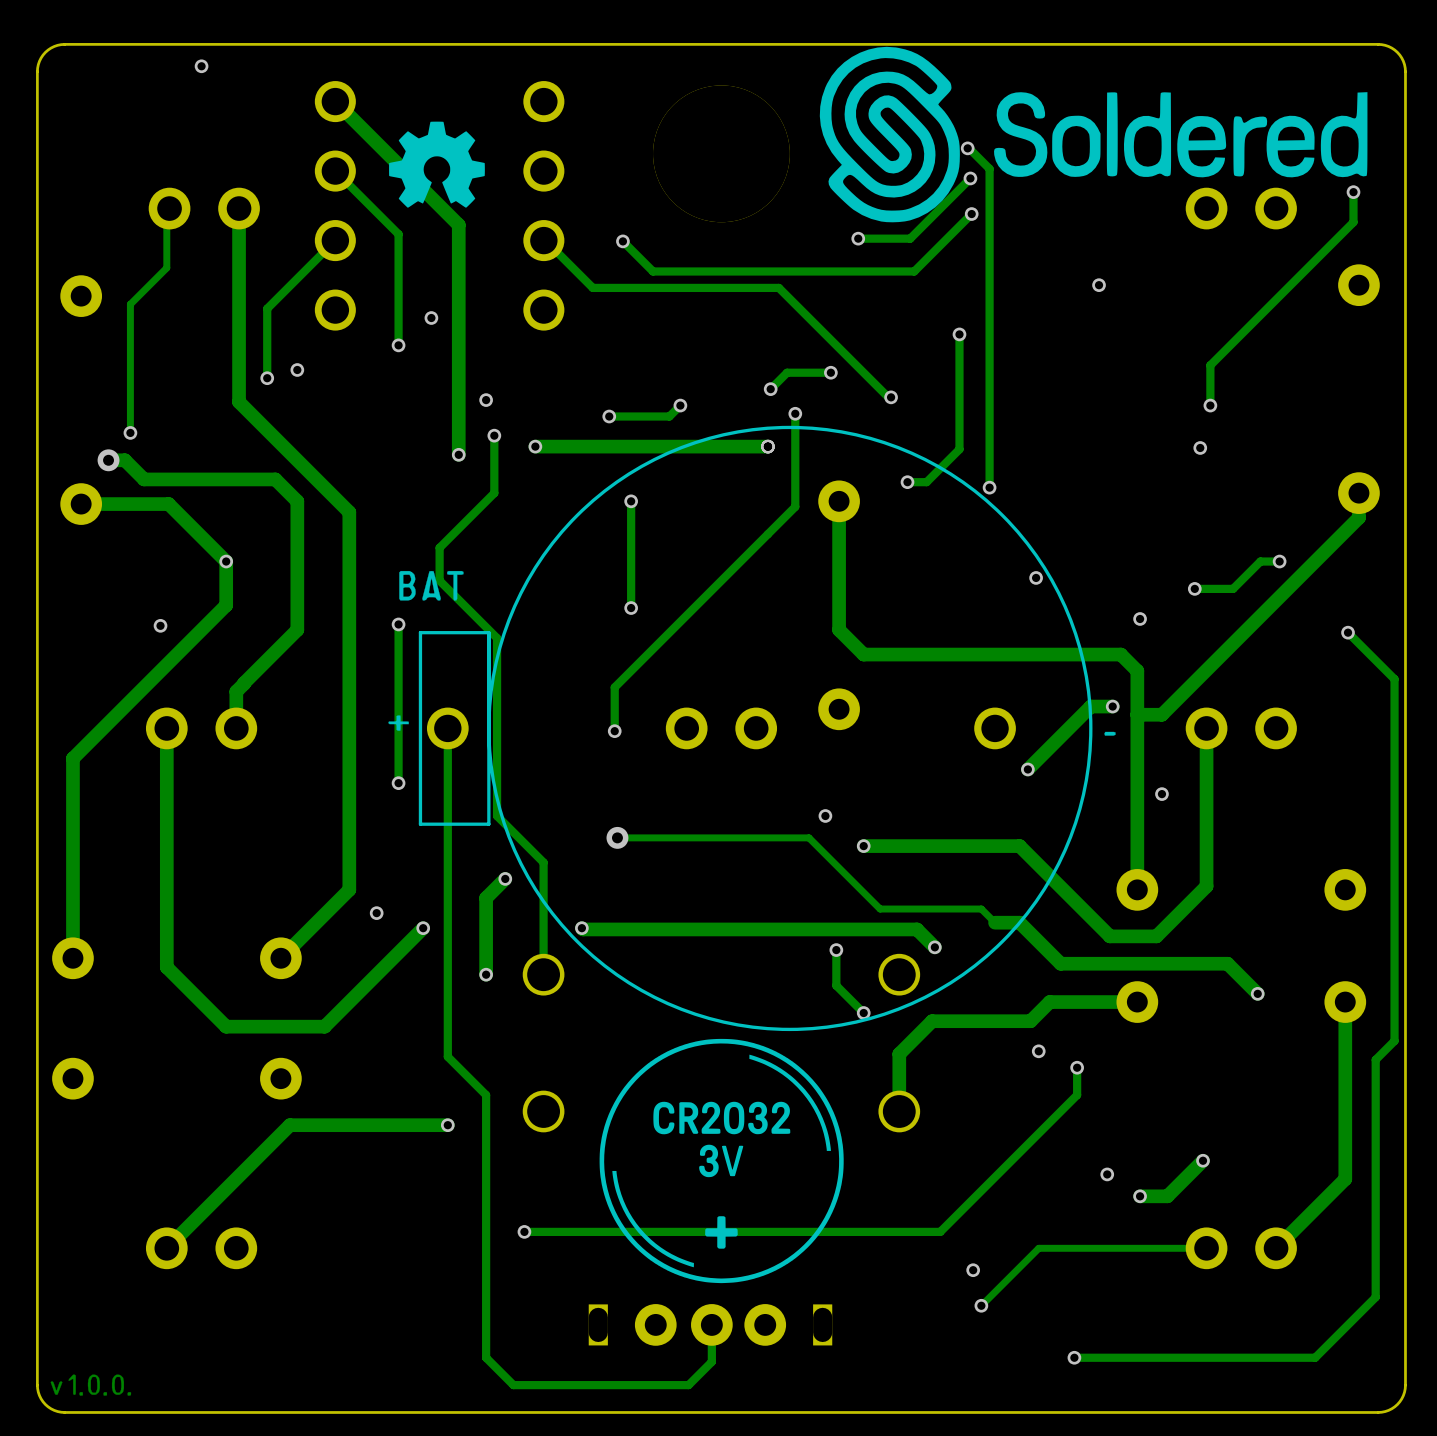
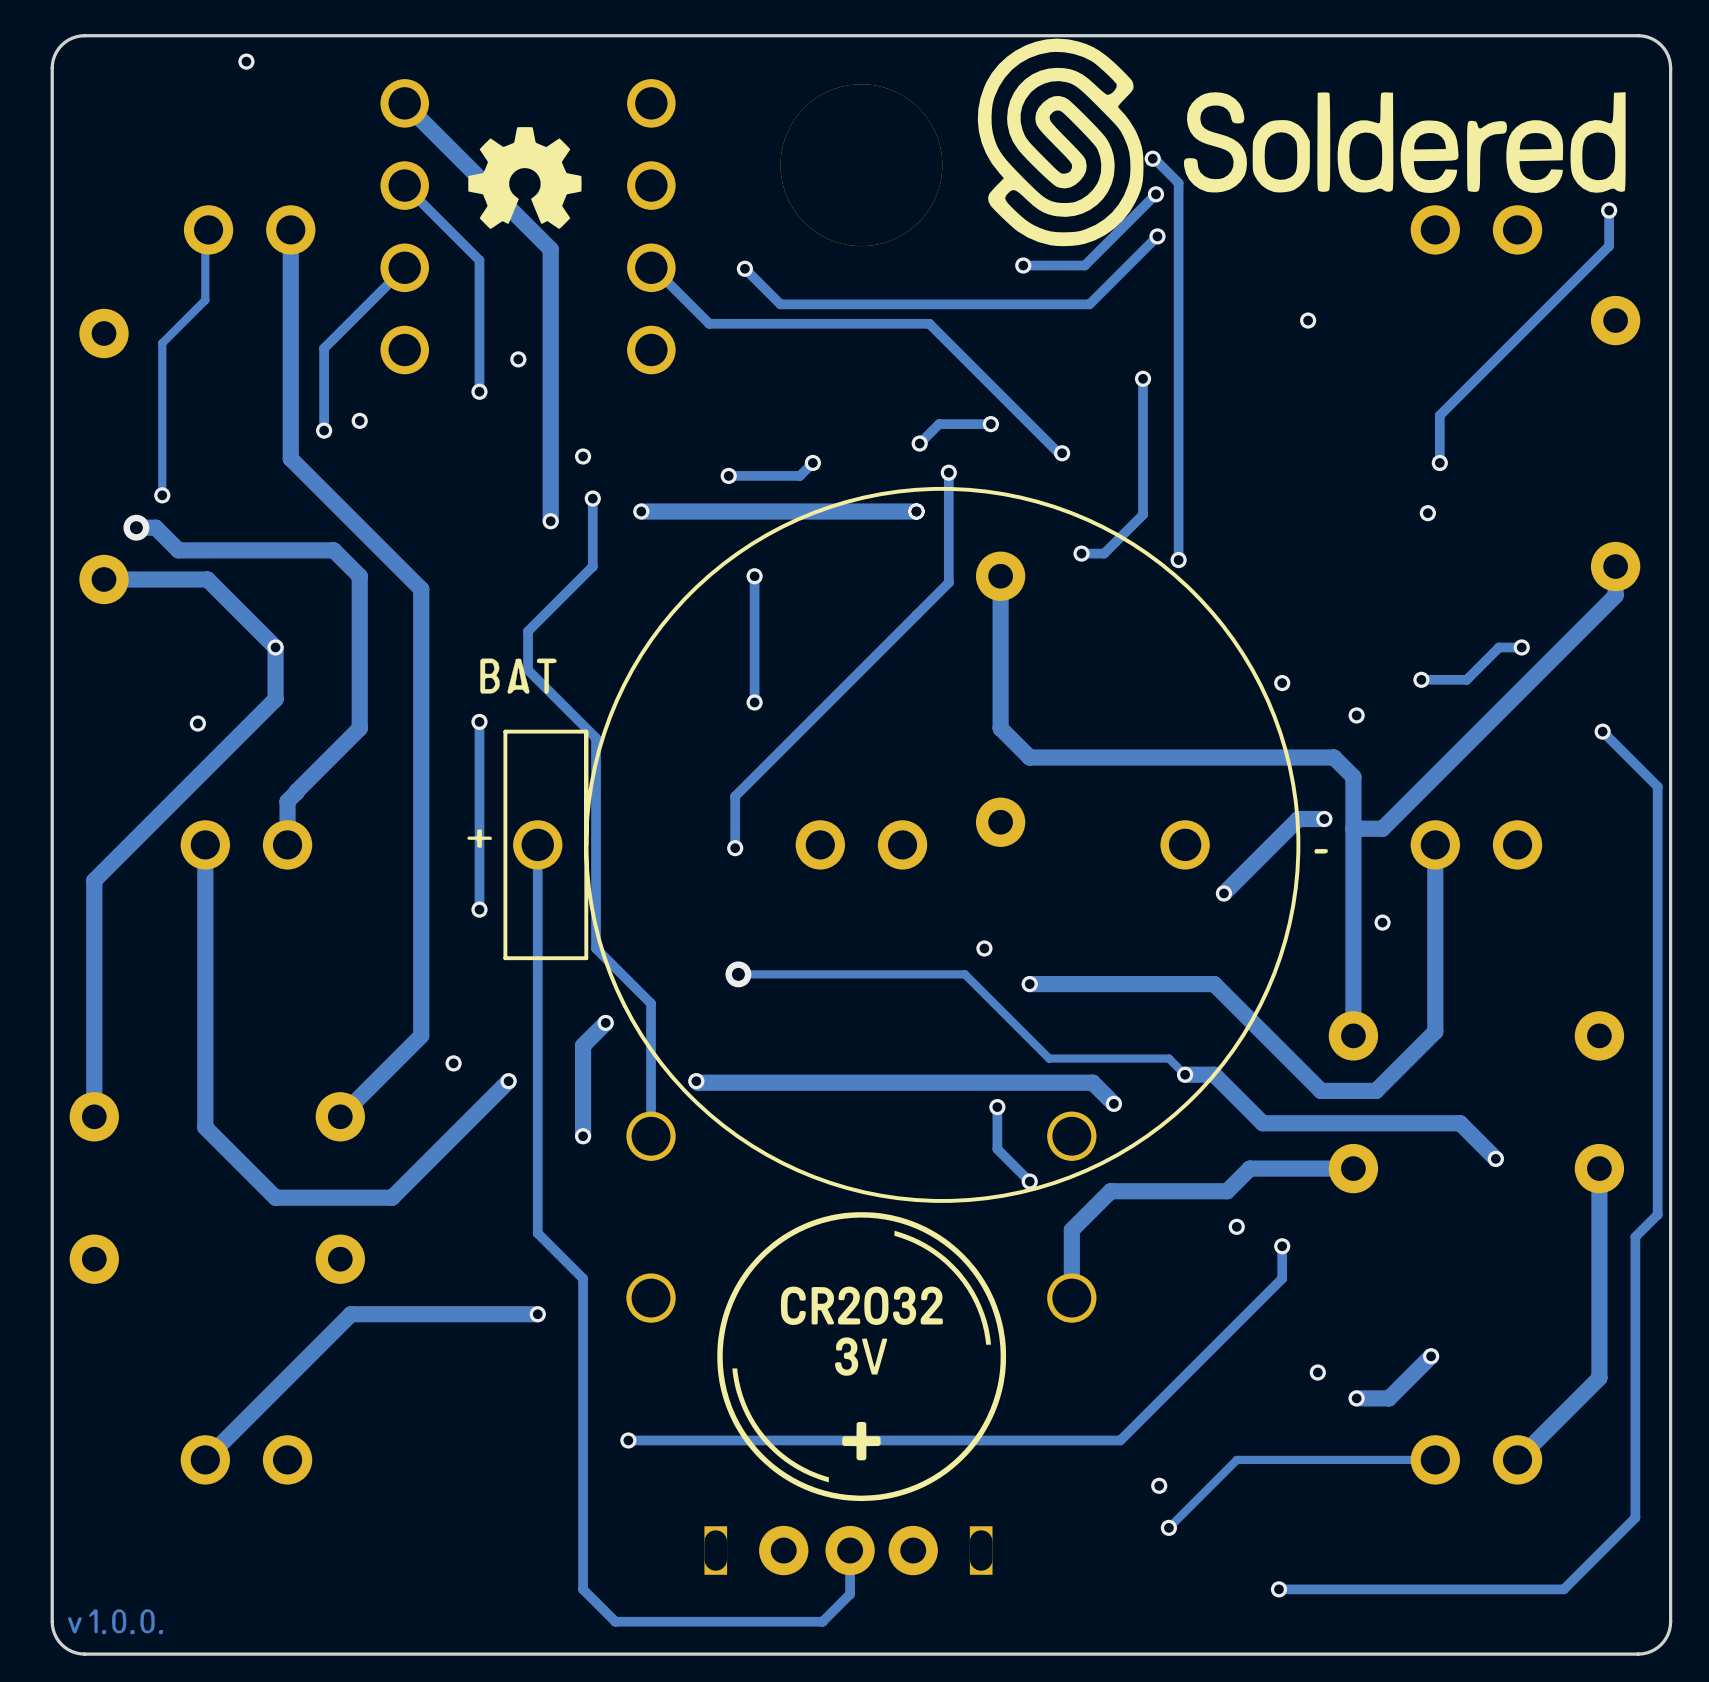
via position: (1036, 577) -> (1282, 683)
via: none -> (1185, 1074)

